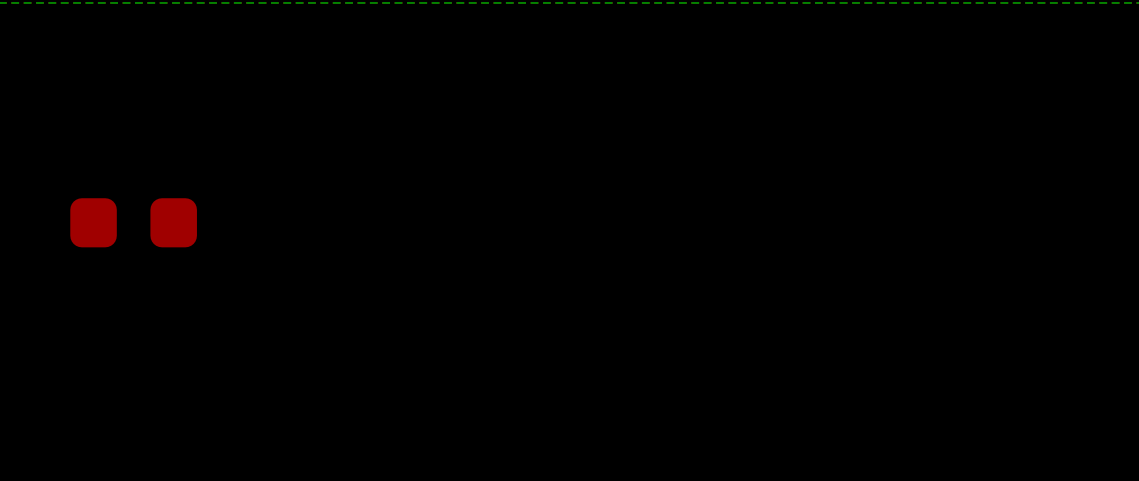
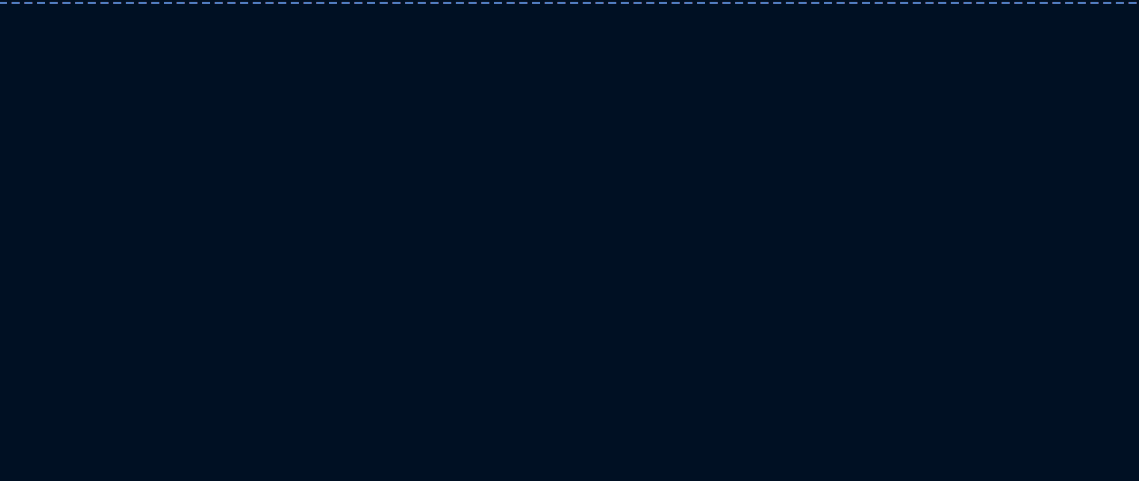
part: (133, 222) -> none

